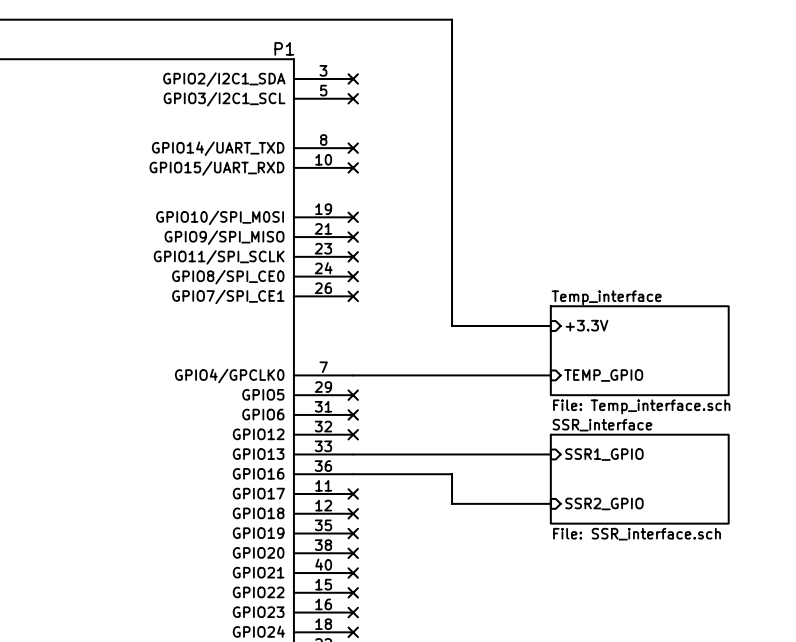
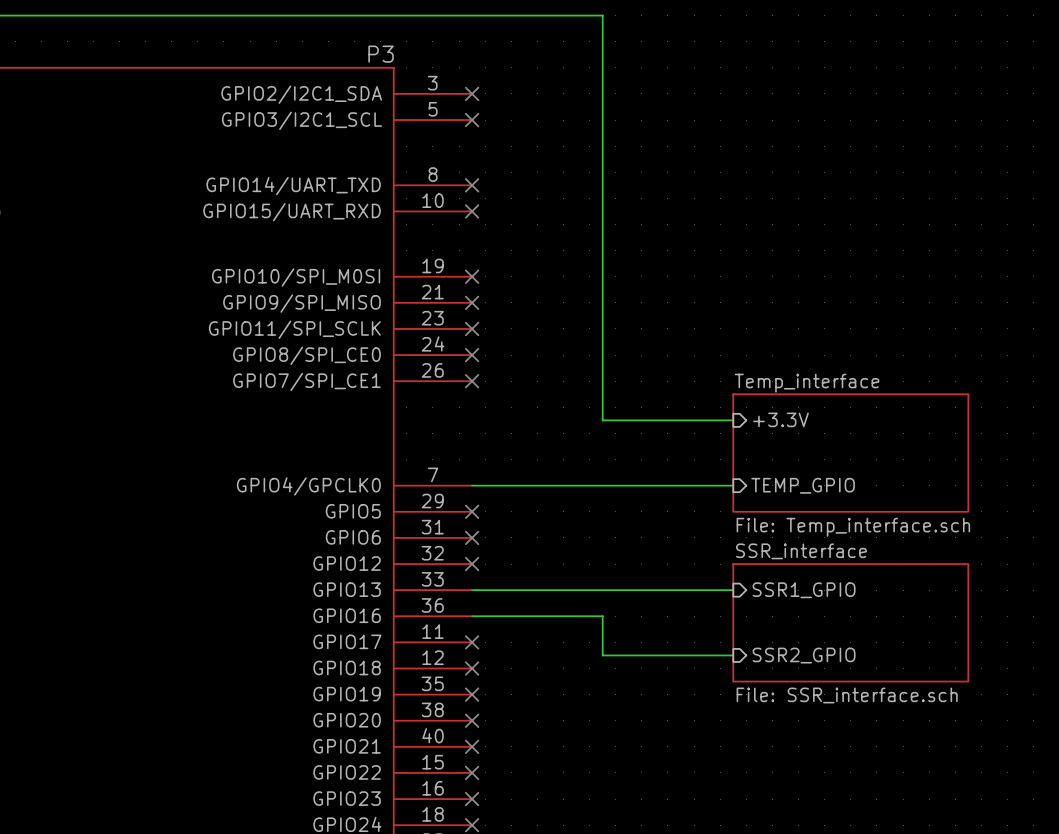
P1 name: P1 (284, 48) -> P3 (381, 54)

